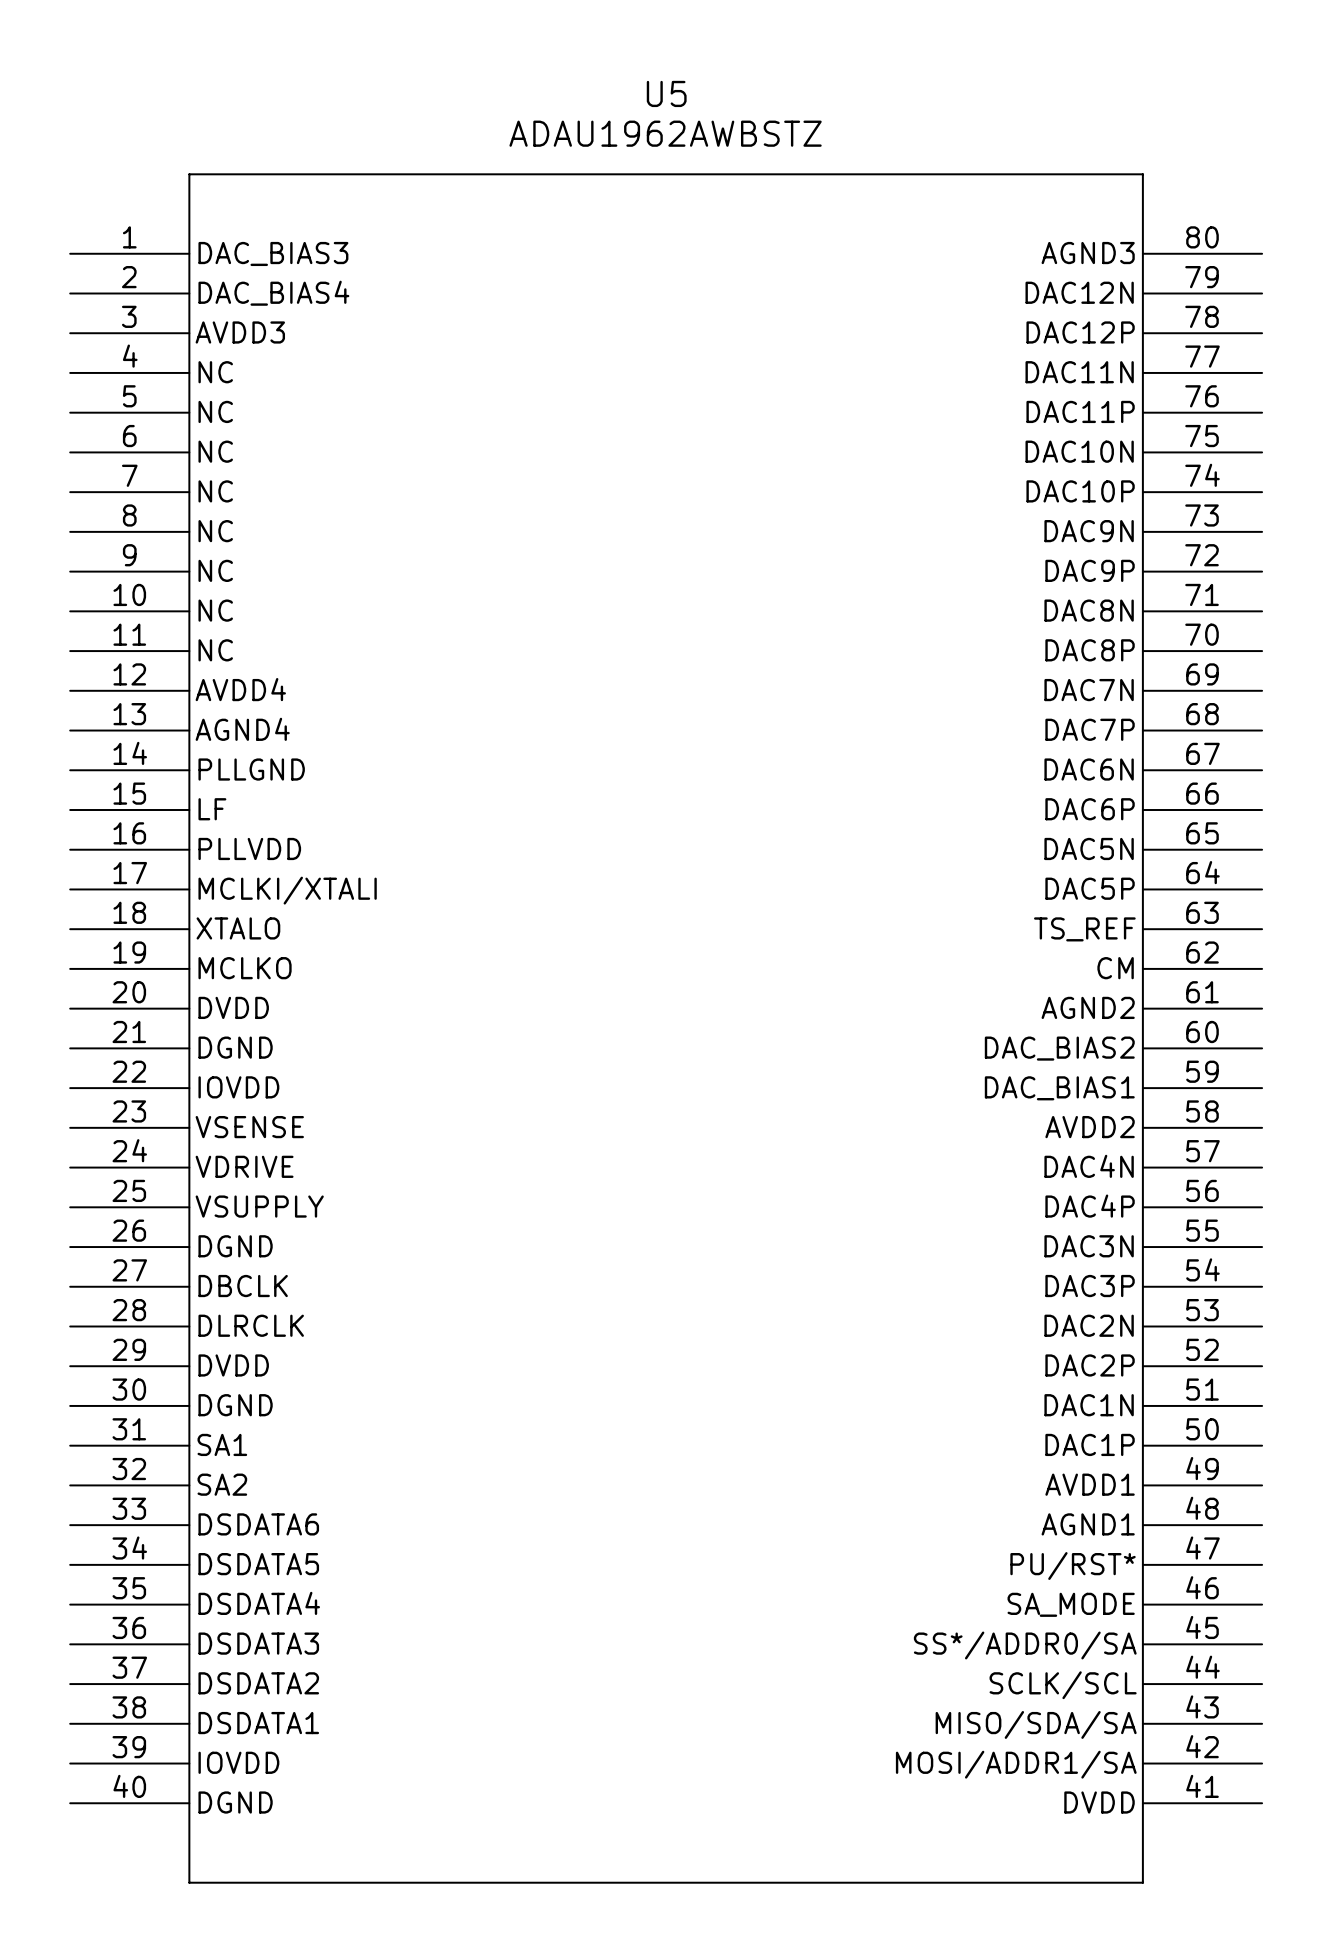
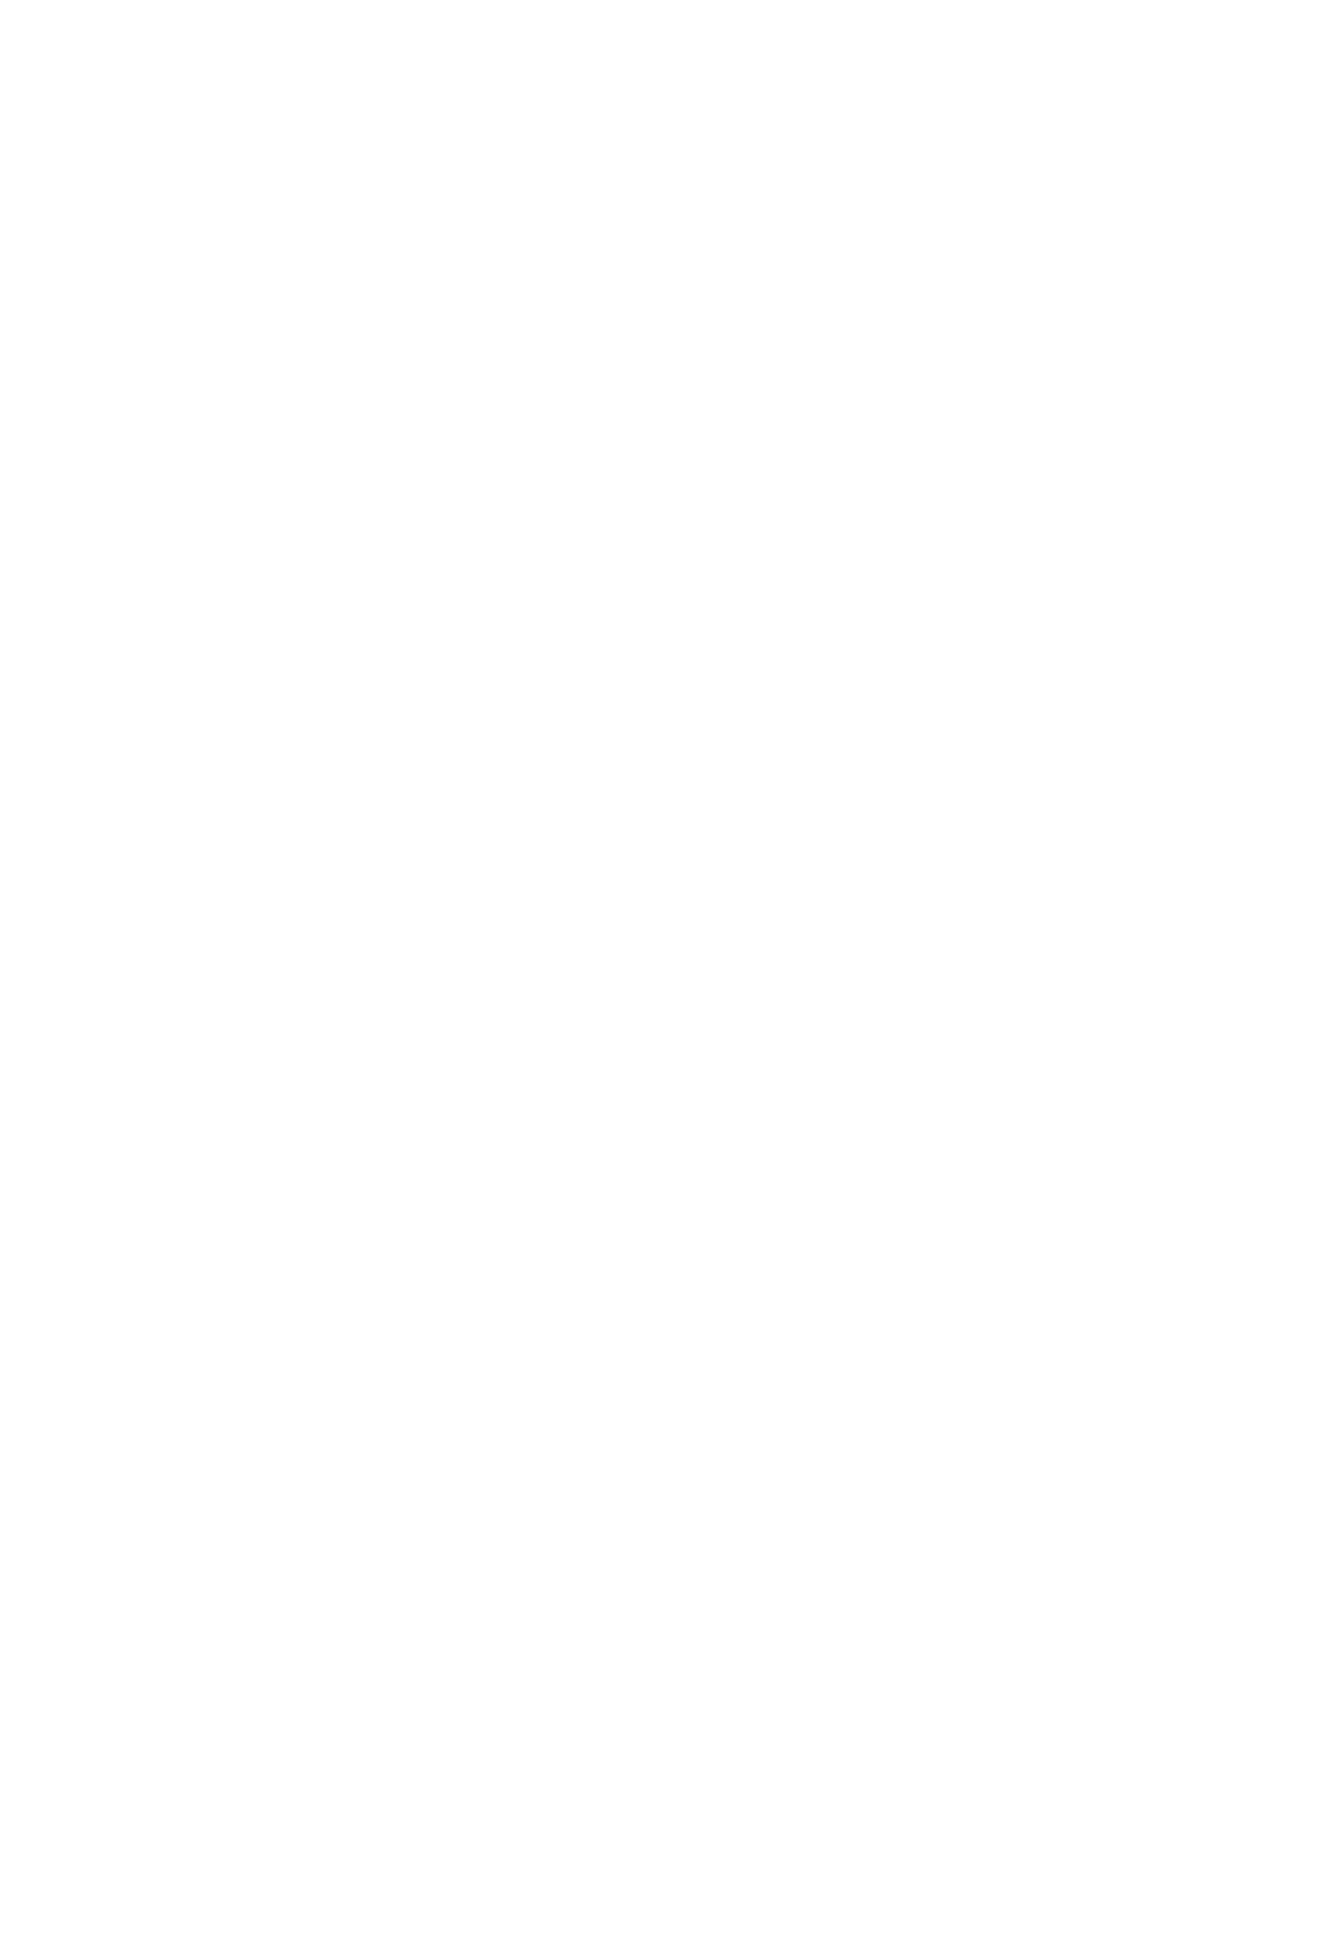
U5: ADAU1962AWBSTZ (666, 1028) -> none

